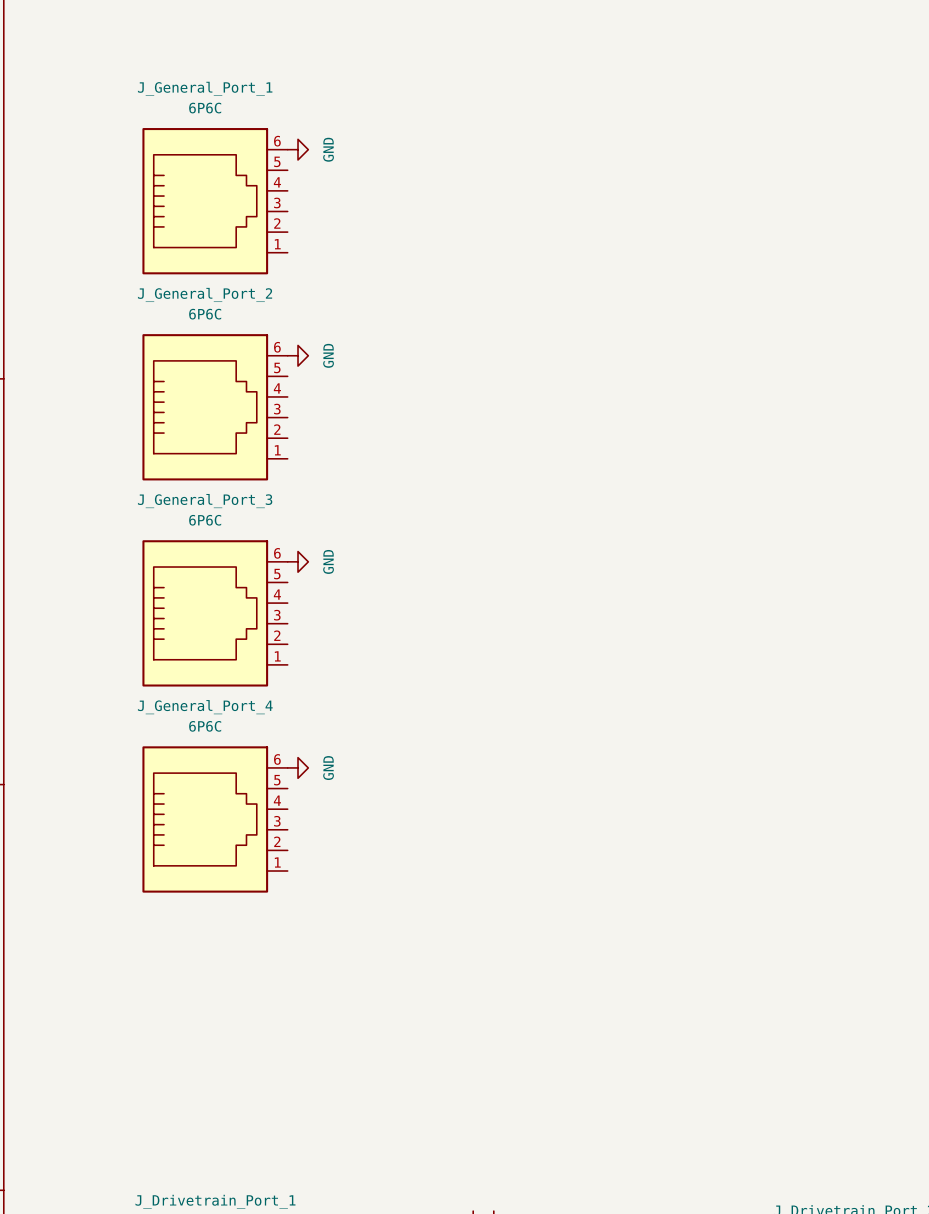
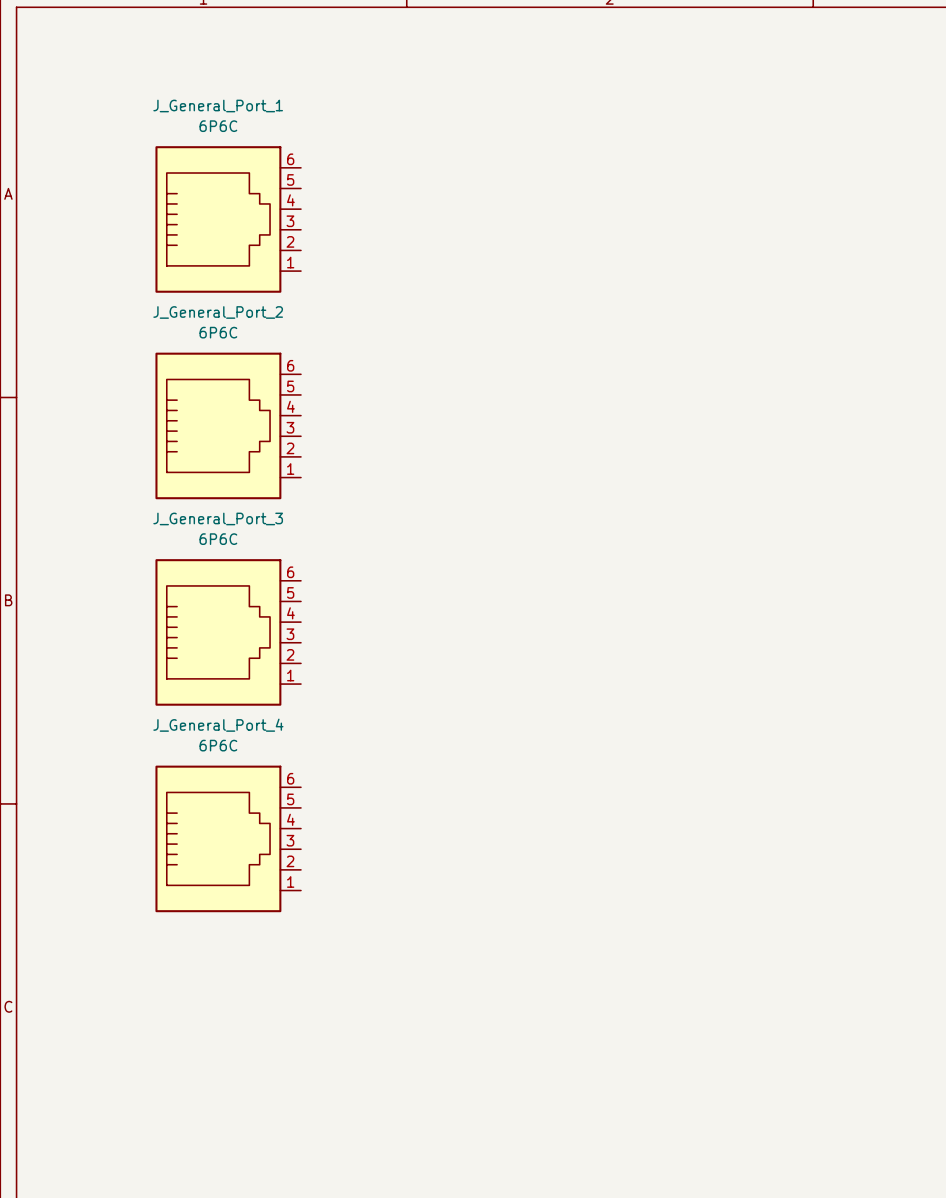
power symbol: GND (298, 149) -> none
power symbol: GND (298, 355) -> none
power symbol: GND (298, 561) -> none
power symbol: GND (298, 767) -> none

